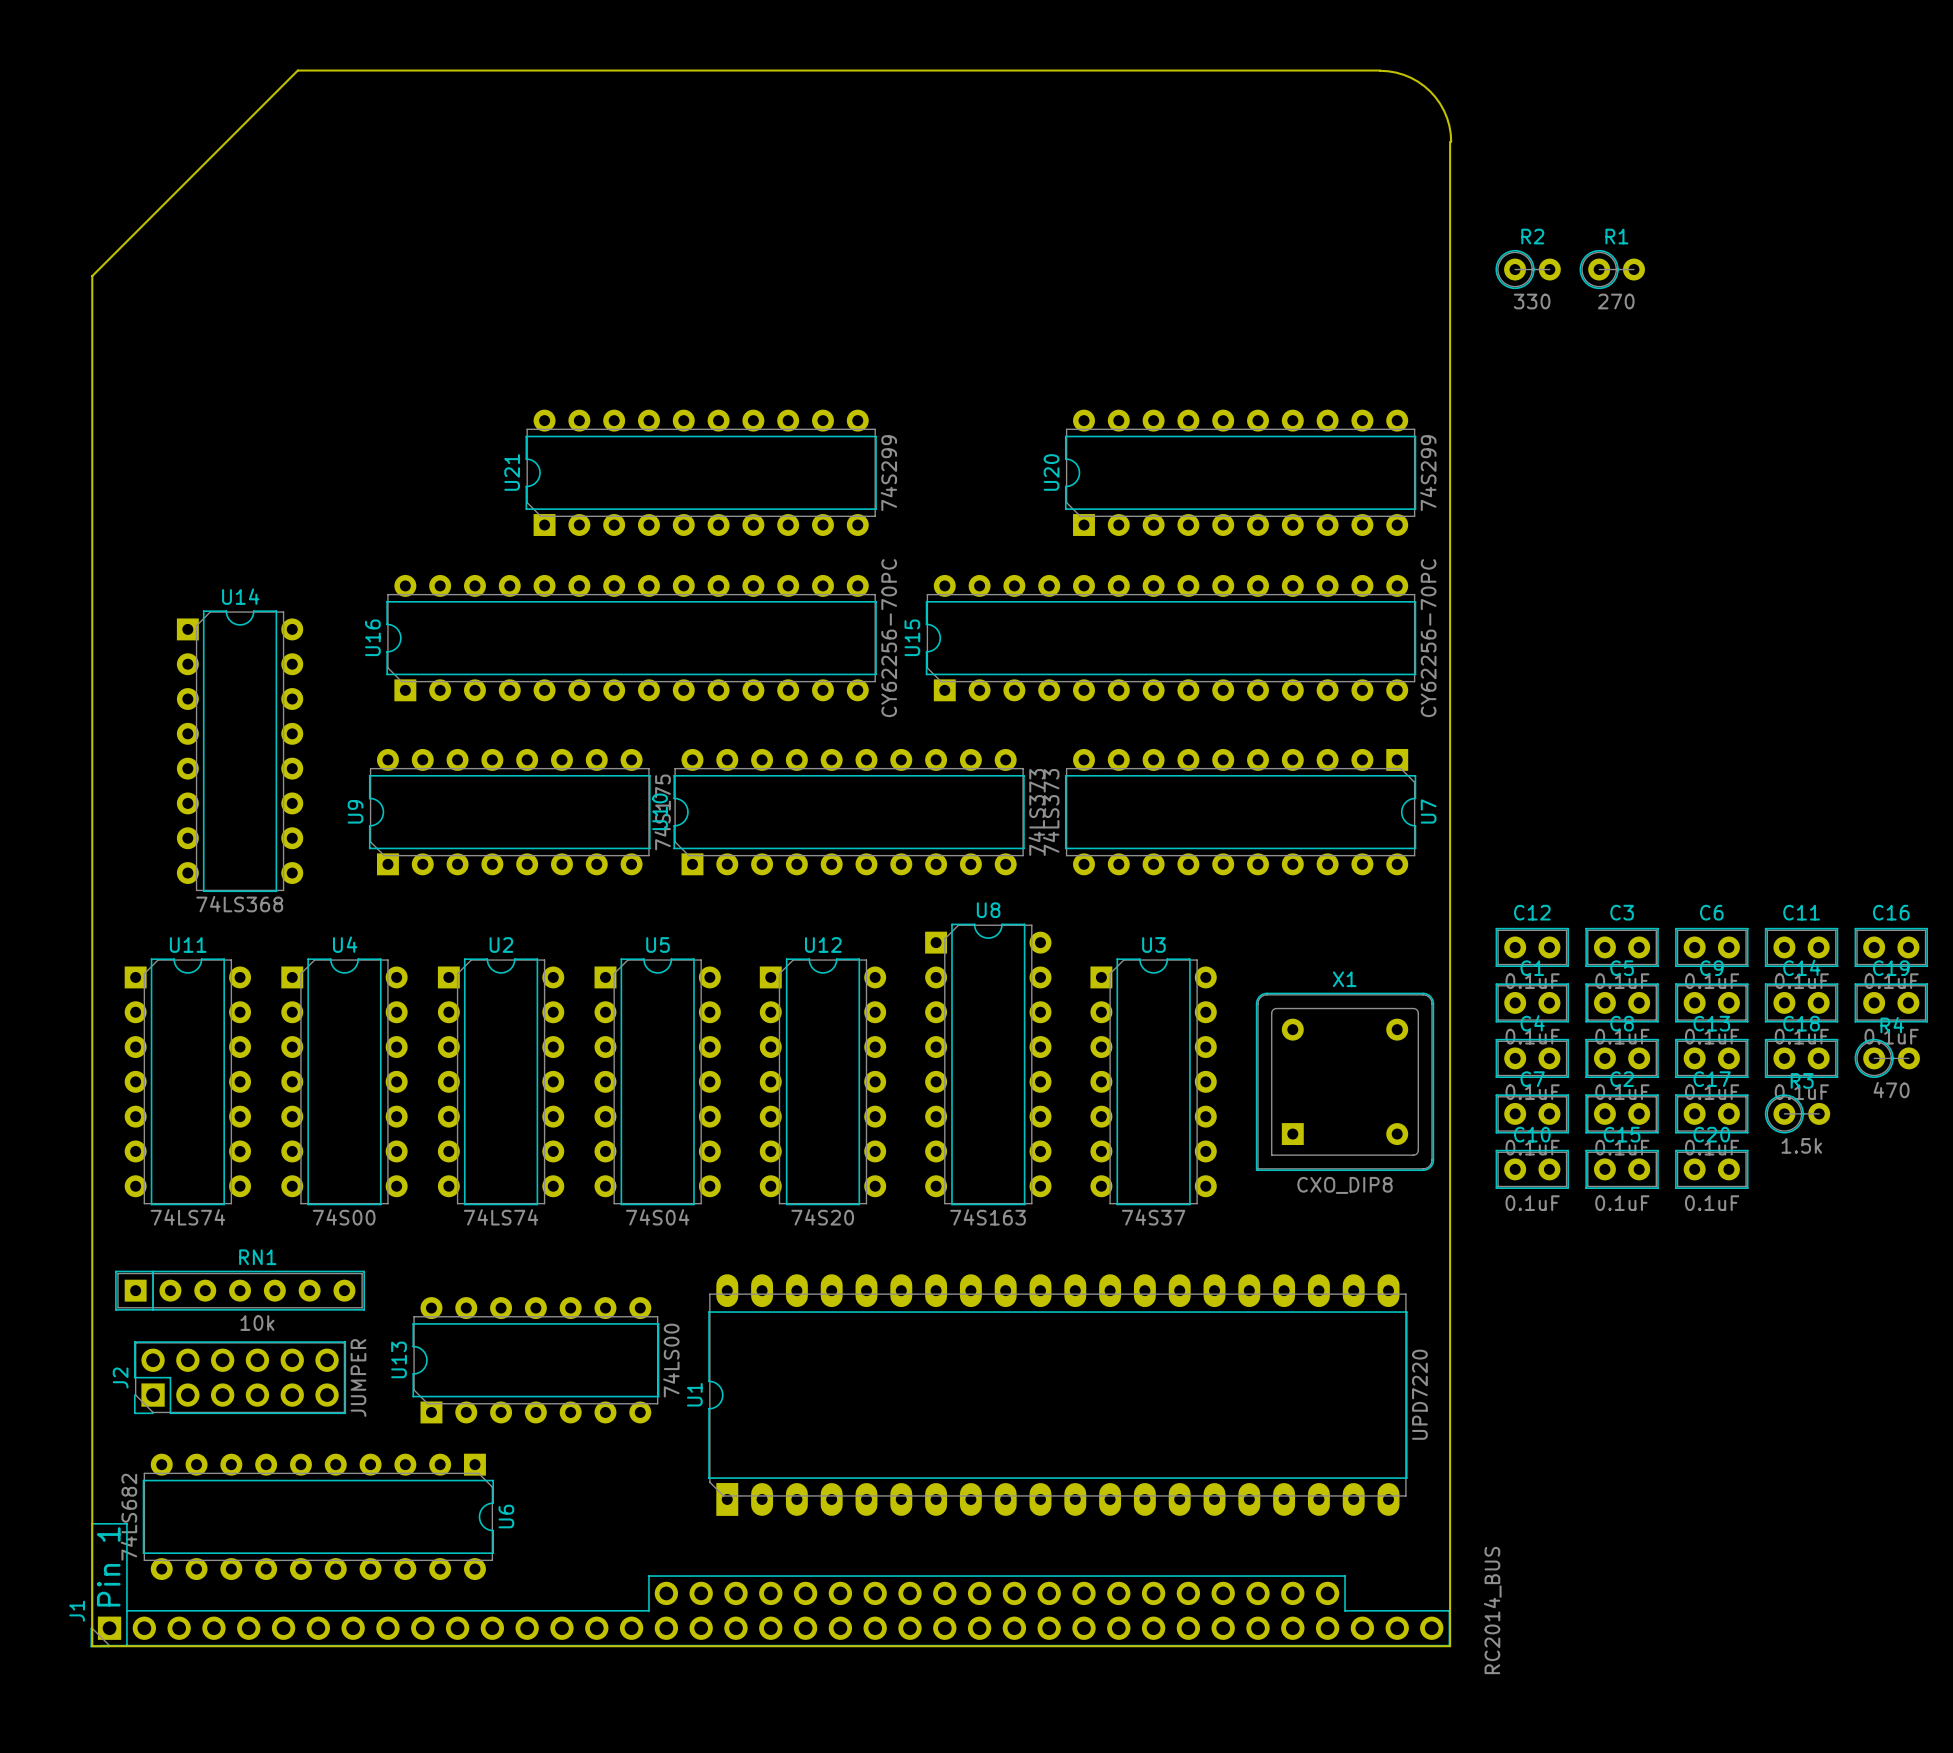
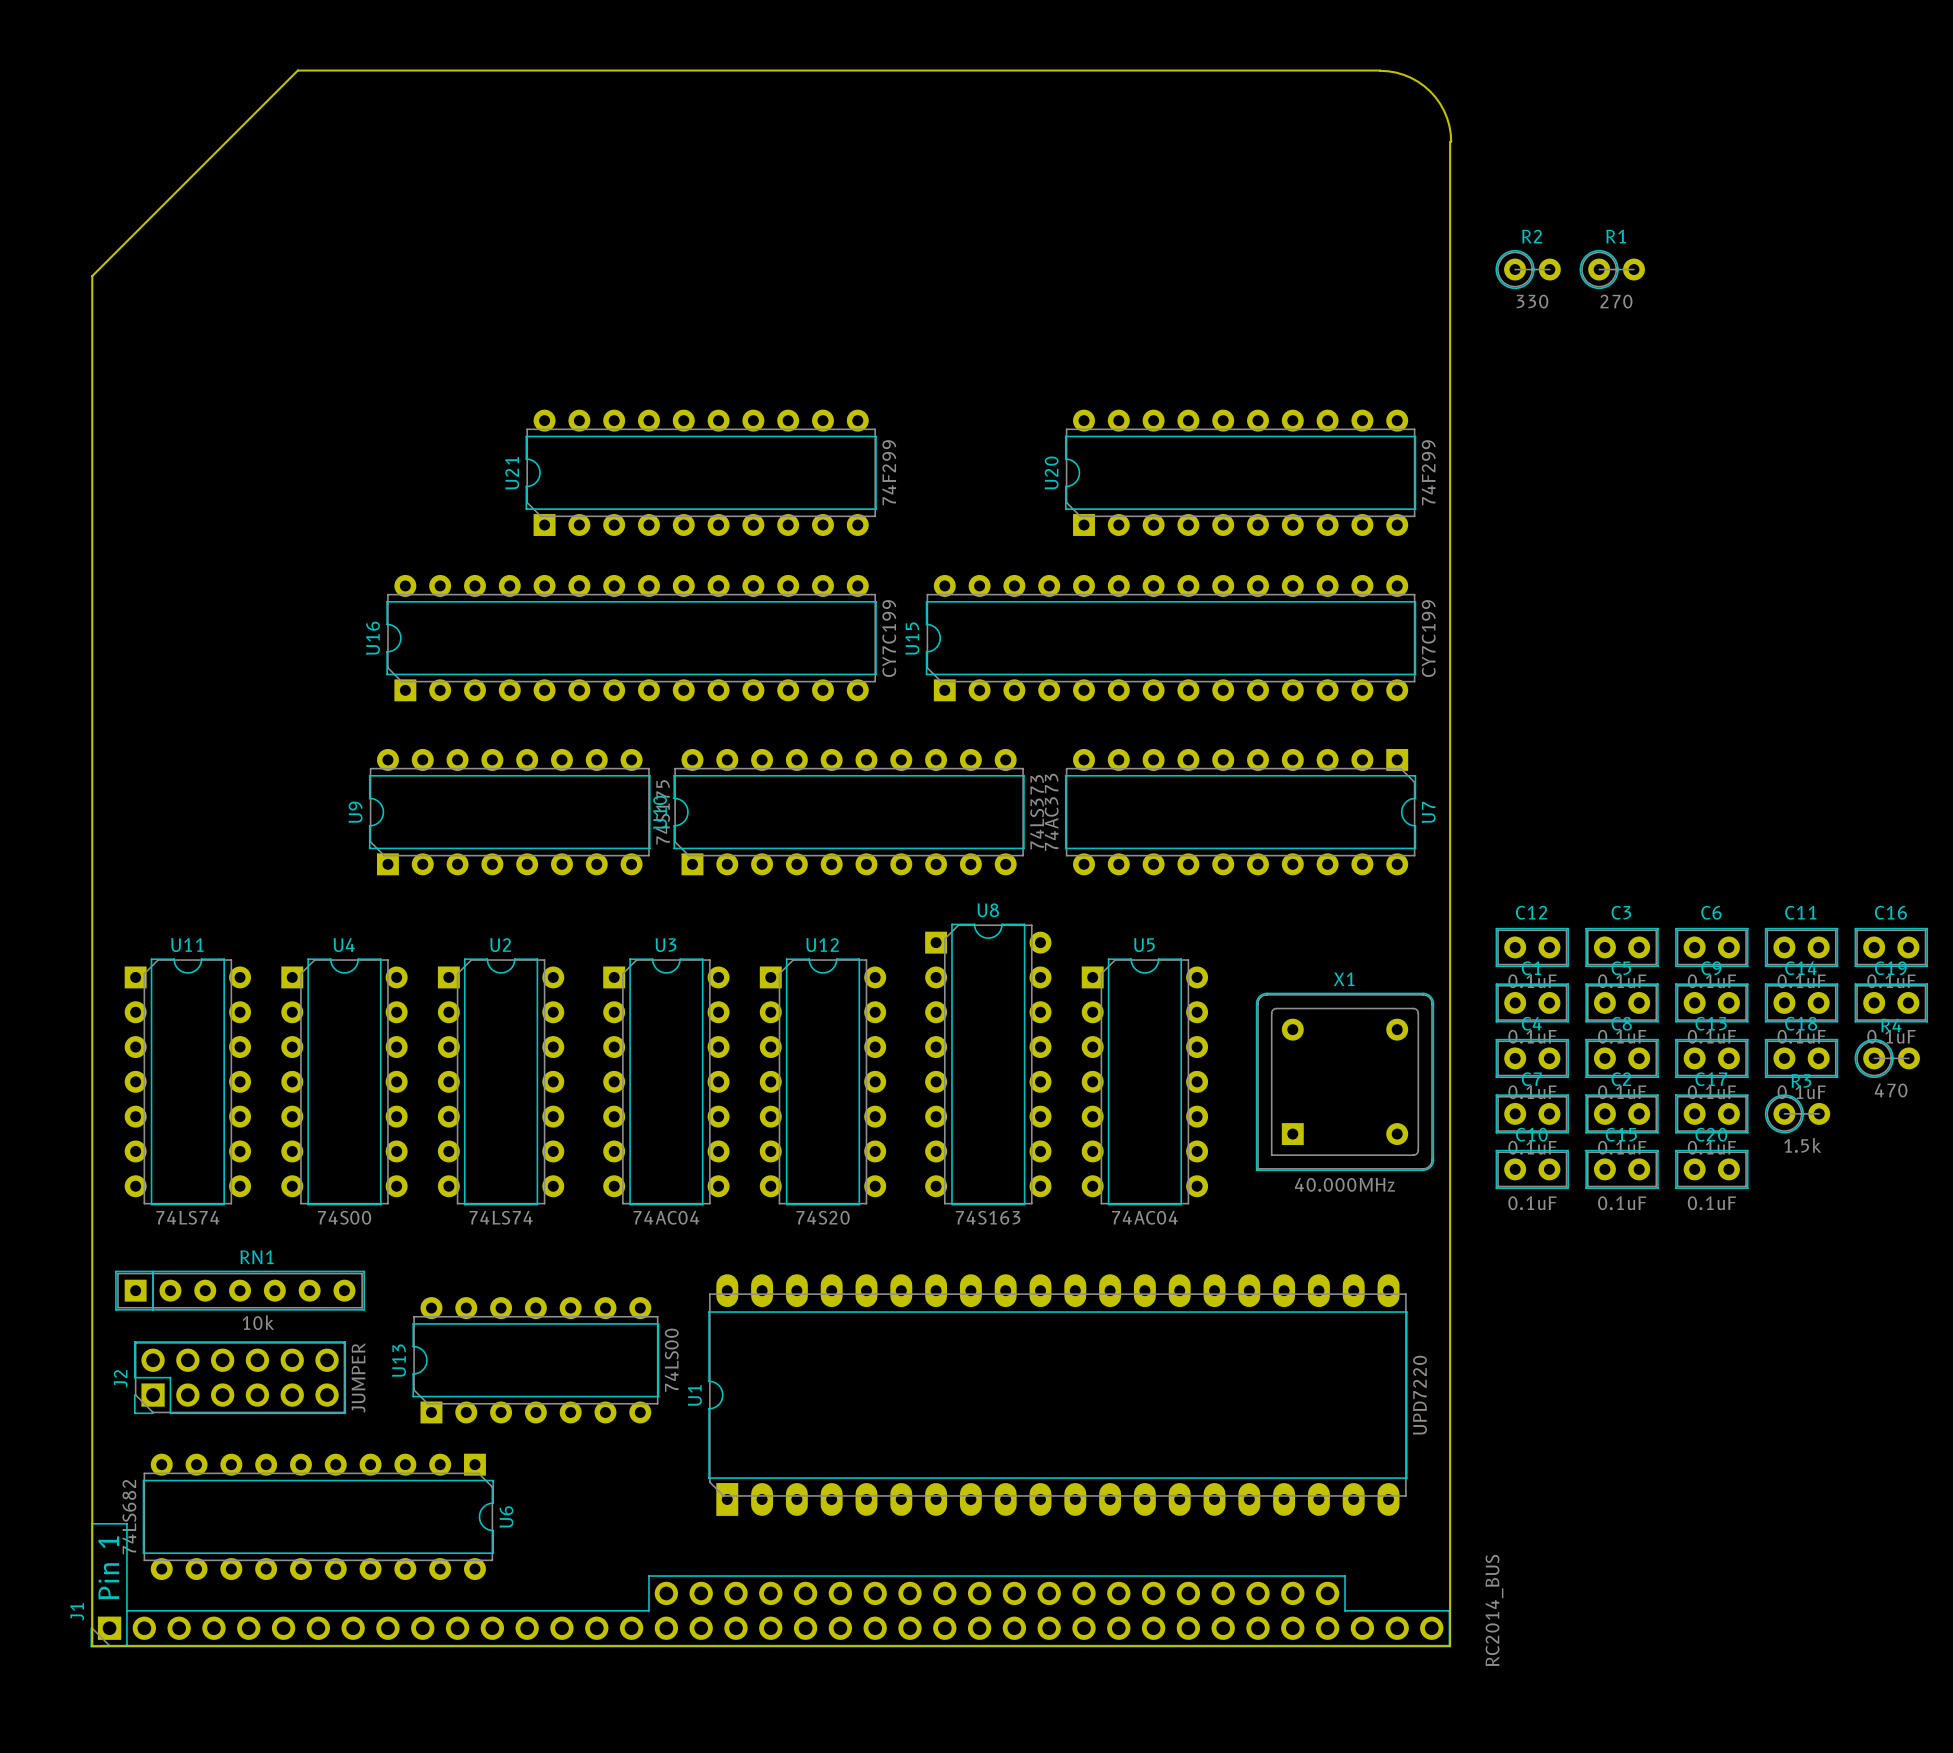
U21 value: 74S299 (888, 473) -> 74F299 (889, 472)
U20 value: 74S299 (1428, 473) -> 74F299 (1428, 472)
U16 value: CY62256-70PC (889, 638) -> CY7C199 (889, 638)
U15 value: CY62256-70PC (1428, 638) -> CY7C199 (1428, 638)
U14: 74LS368 (240, 751) -> none
U7 value: 74LS373 (1051, 812) -> 74AC373 (1051, 812)
U5 position: (657, 1081) -> (1144, 1081)
U3 position: (1153, 1081) -> (666, 1081)
X1 value: CXO_DIP8 (1345, 1185) -> 40.000MHz (1345, 1184)
U5 value: 74S04 (657, 1217) -> 74AC04 (1144, 1217)
U3 value: 74S37 (1153, 1217) -> 74AC04 (666, 1217)

